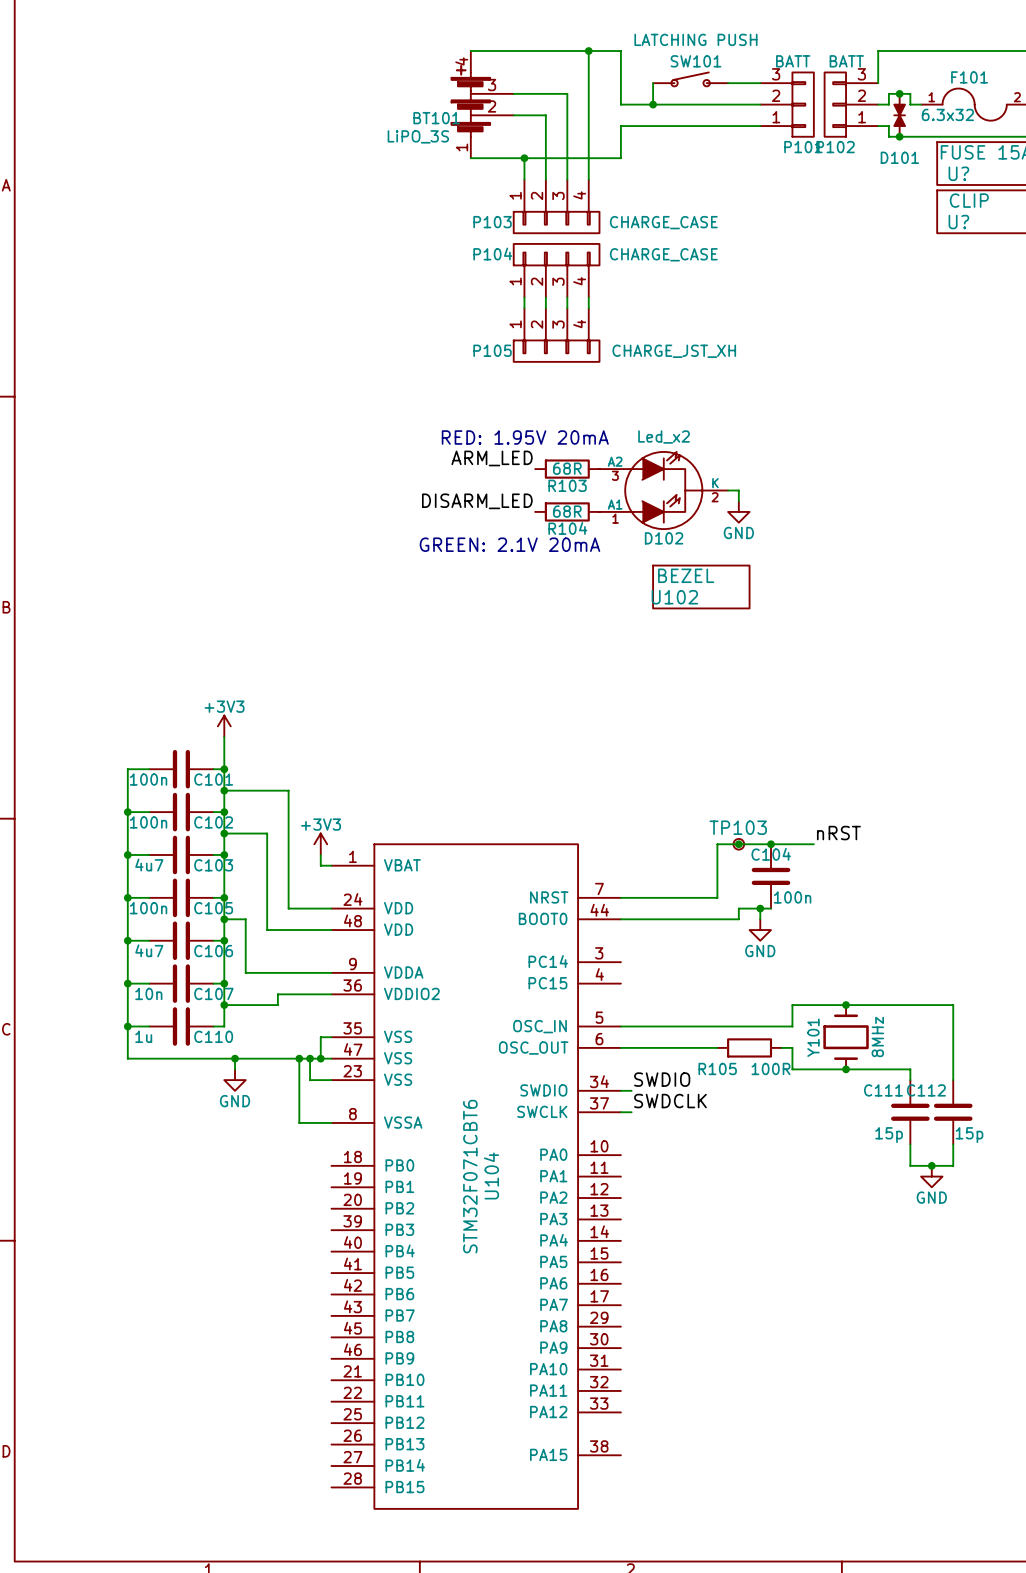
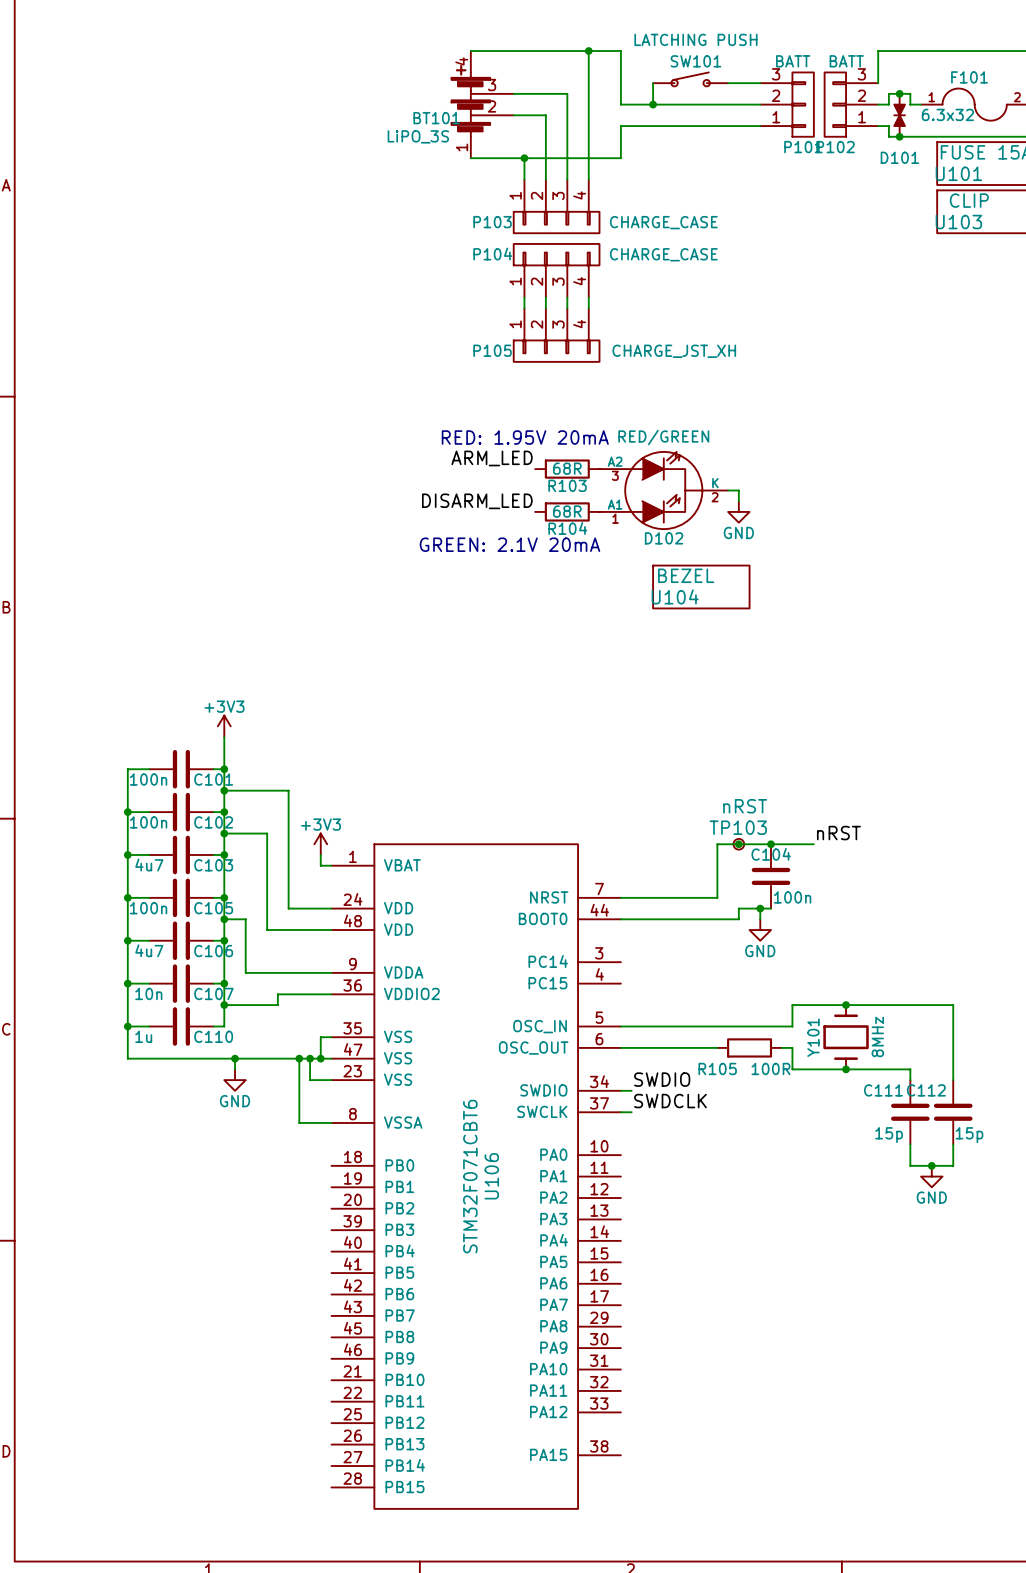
U? name: U? (958, 173) -> U101 (958, 173)
U? name: U? (958, 222) -> U103 (958, 222)
D102 value: Led_x2 (664, 437) -> RED/GREEN (663, 437)
U102 name: U102 (674, 597) -> U104 (675, 596)
TP103 value: none -> nRST (745, 806)
U104 name: U104 (491, 1175) -> U106 (491, 1176)

